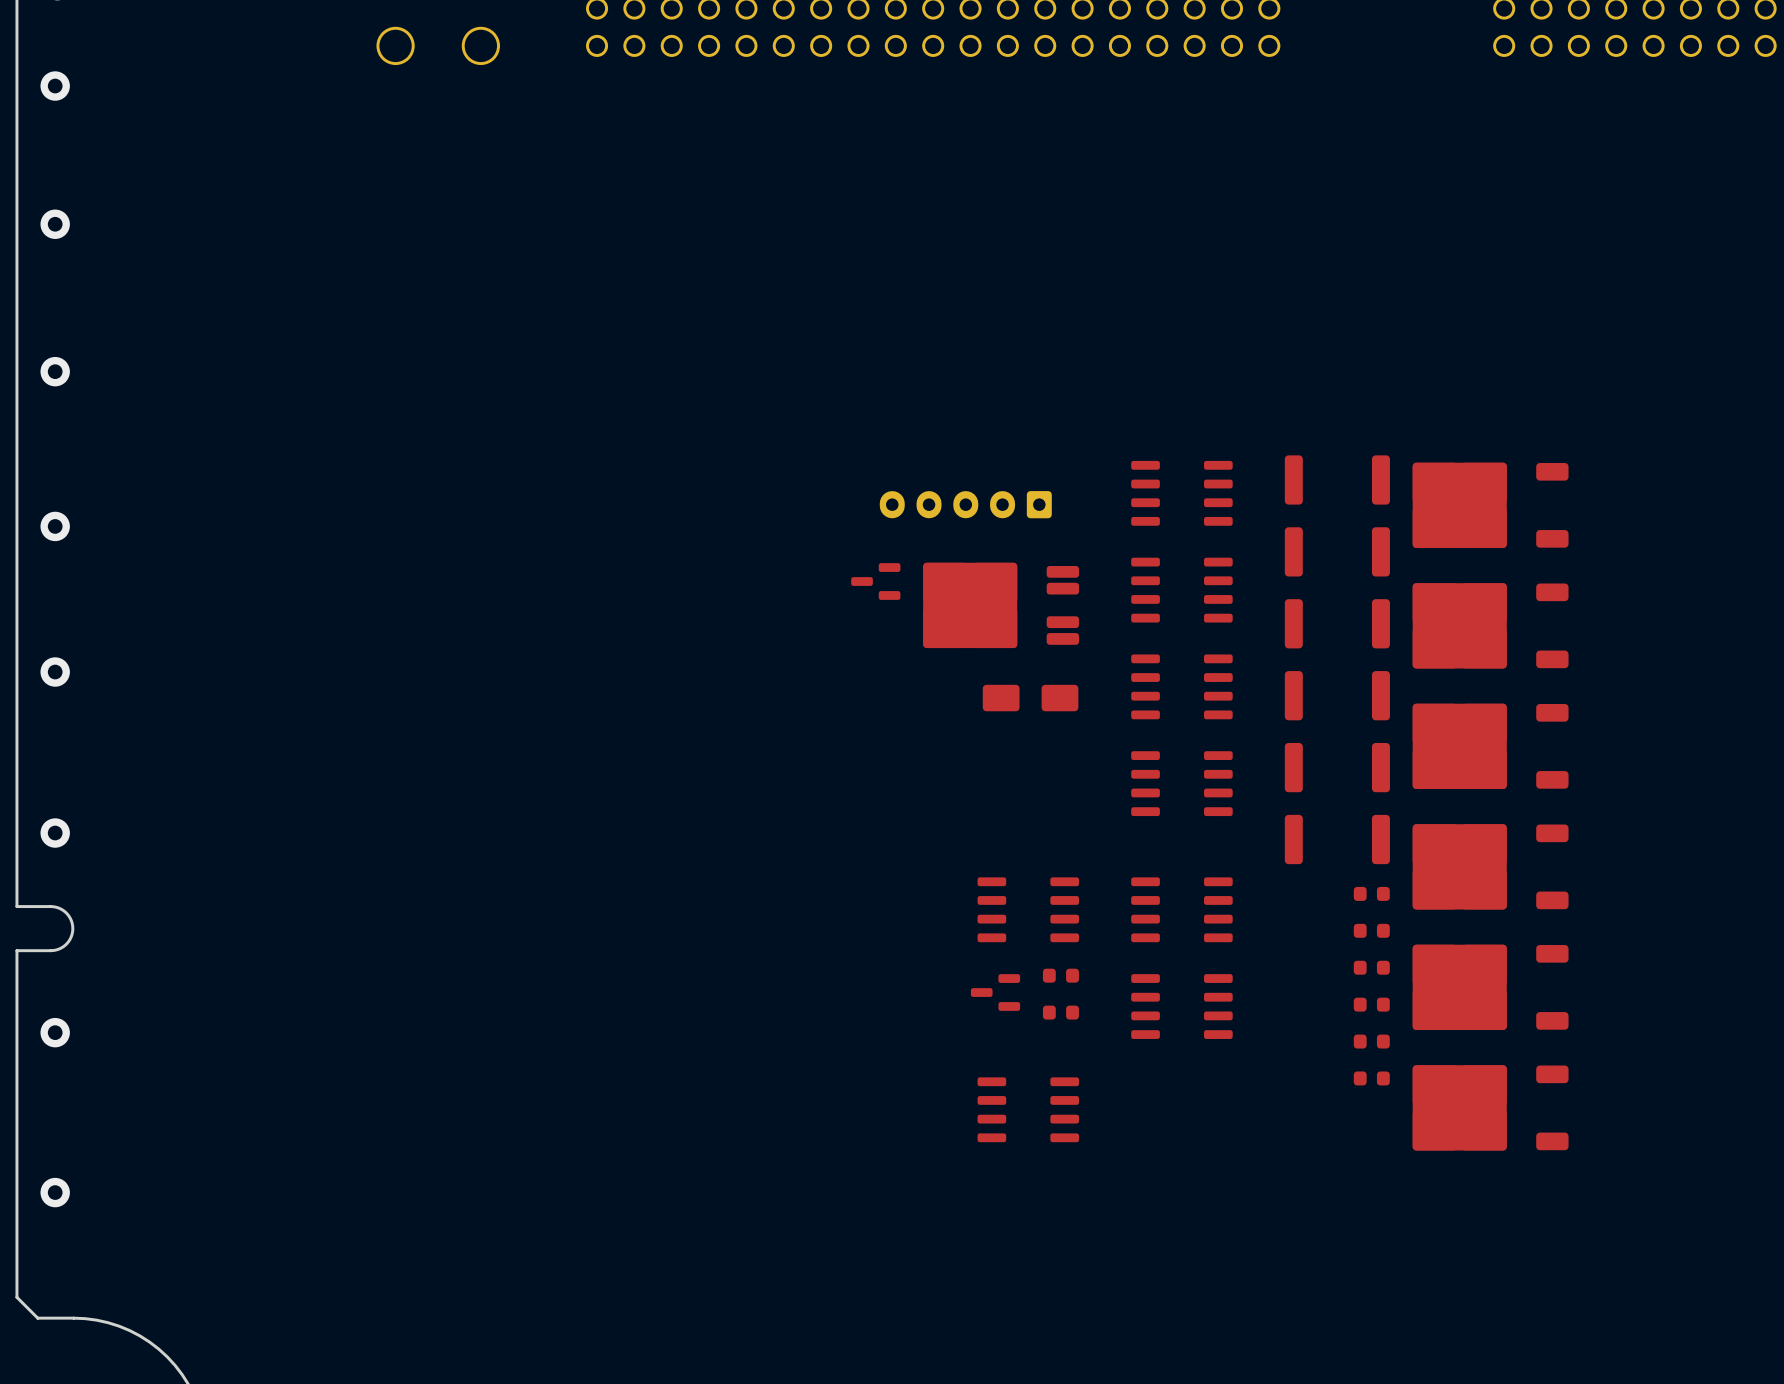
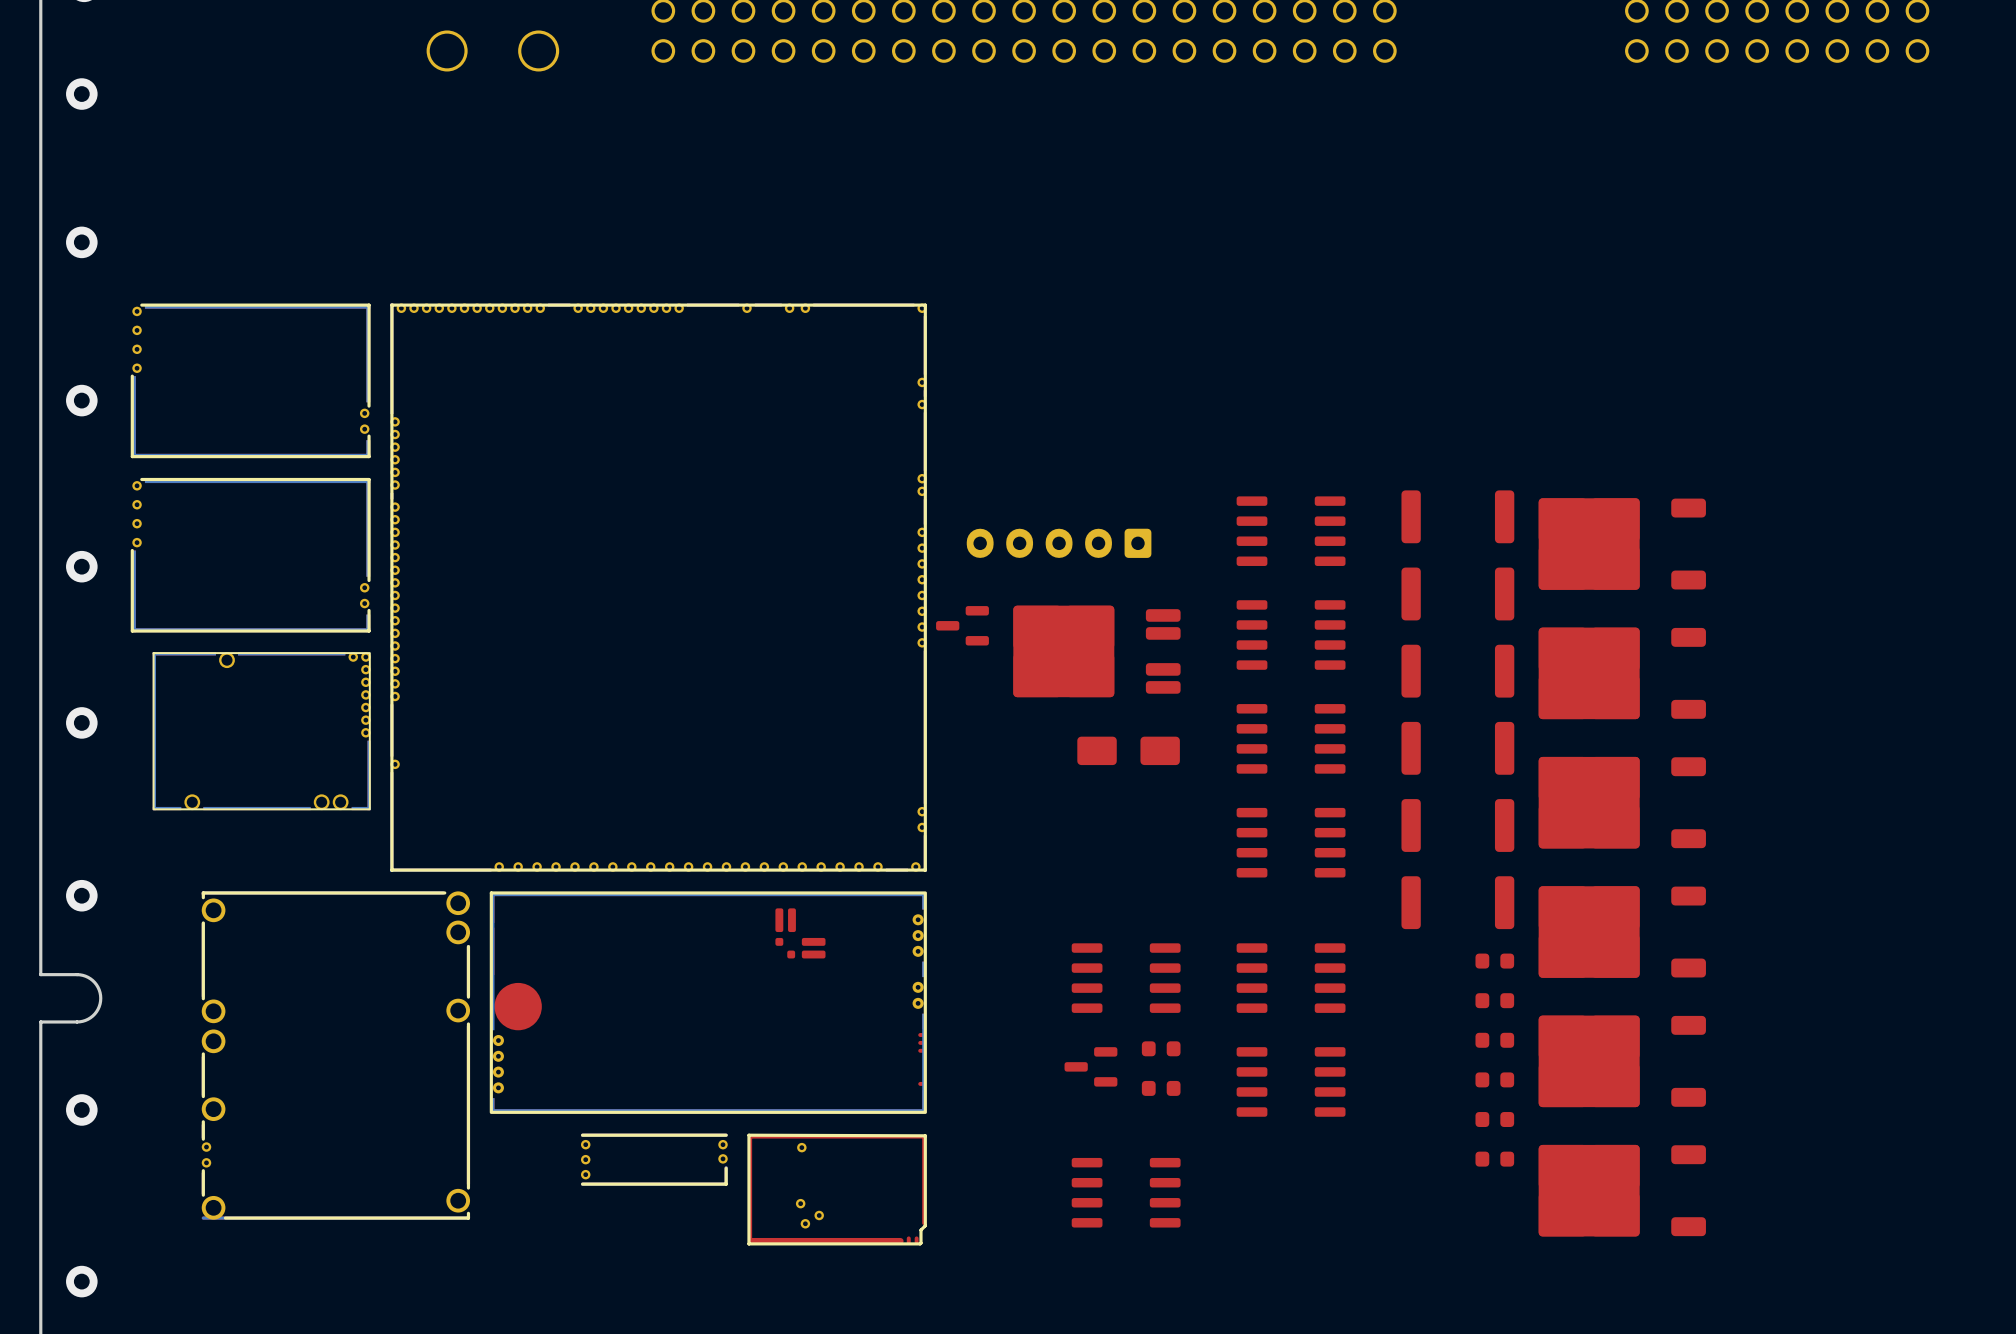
part: none -> (250, 380)
part: none -> (250, 555)
part: none -> (658, 587)
part: none -> (261, 731)
part: none -> (708, 1002)
part: none -> (335, 1055)
part: none -> (654, 1159)
part: none -> (837, 1189)

